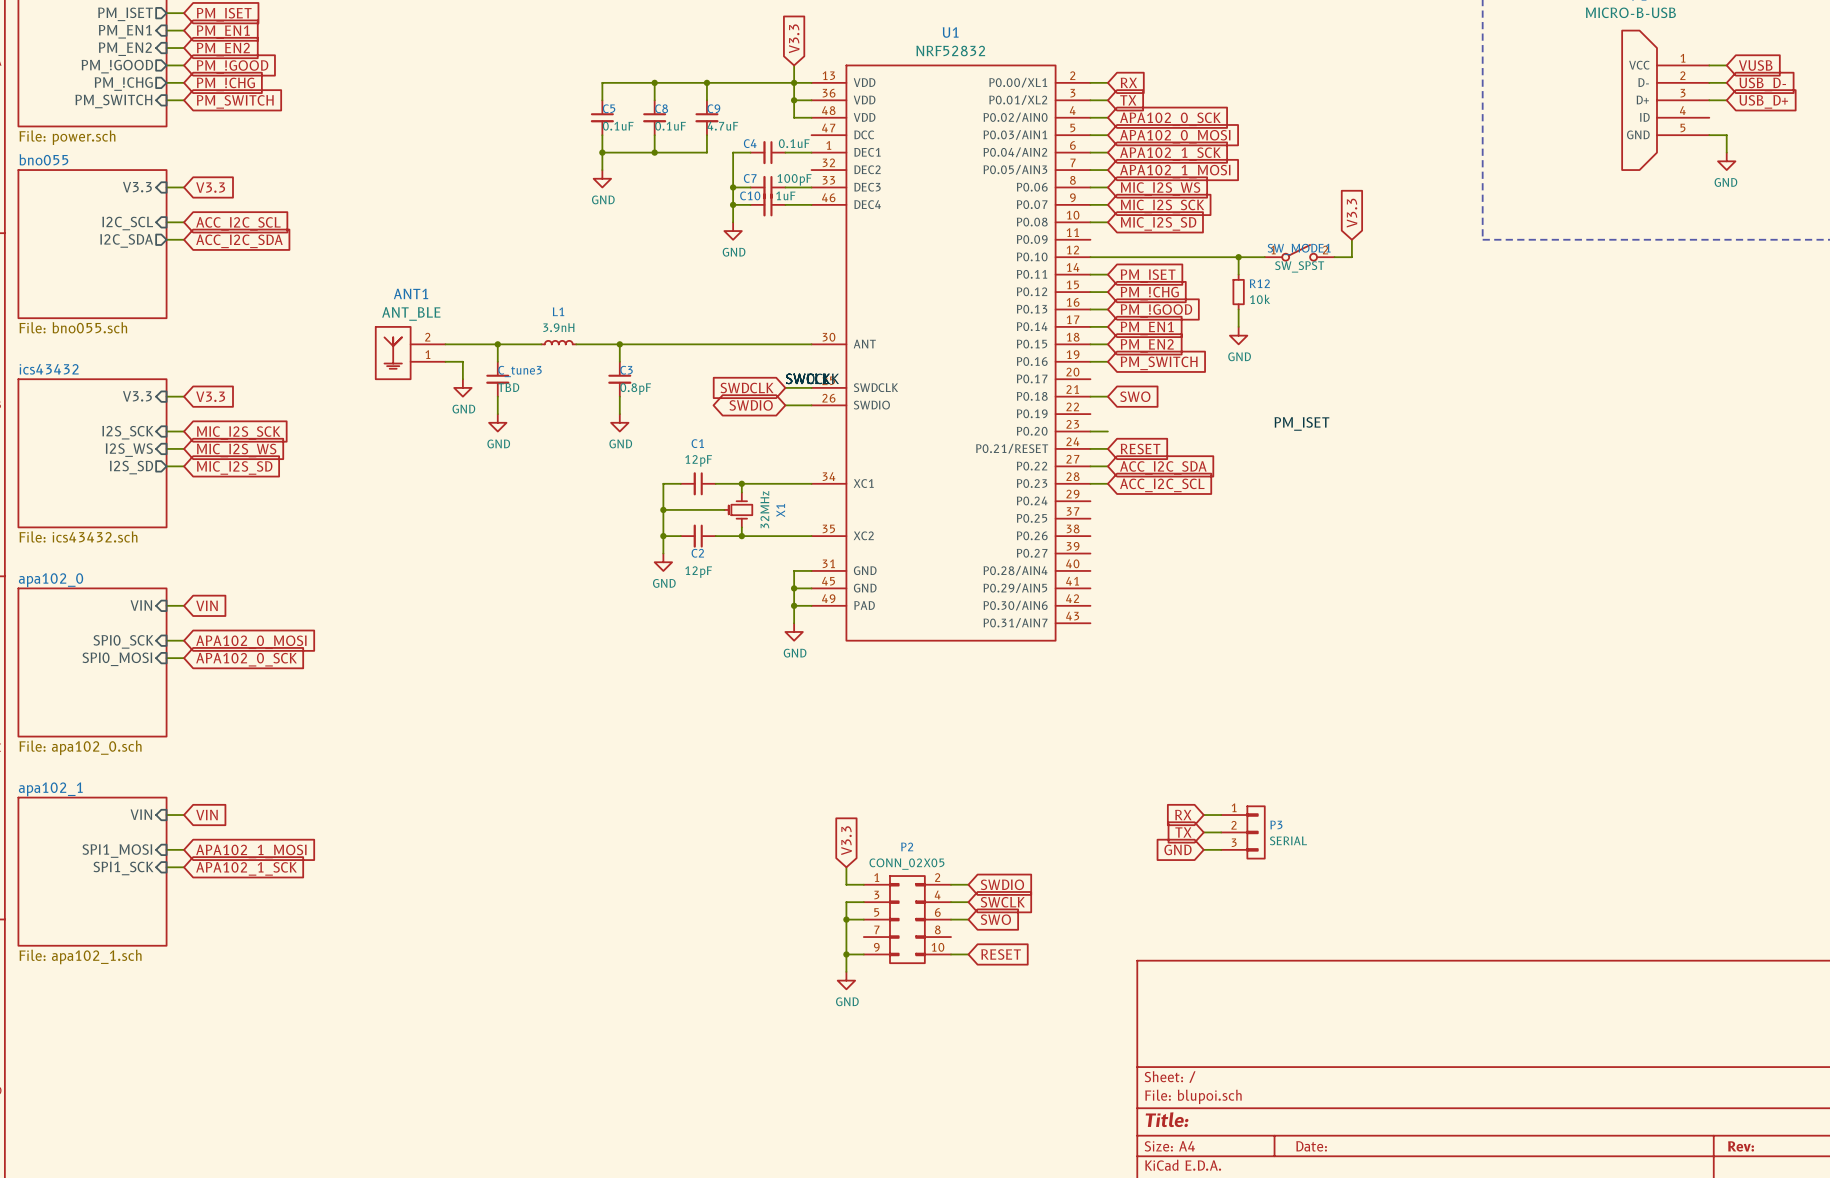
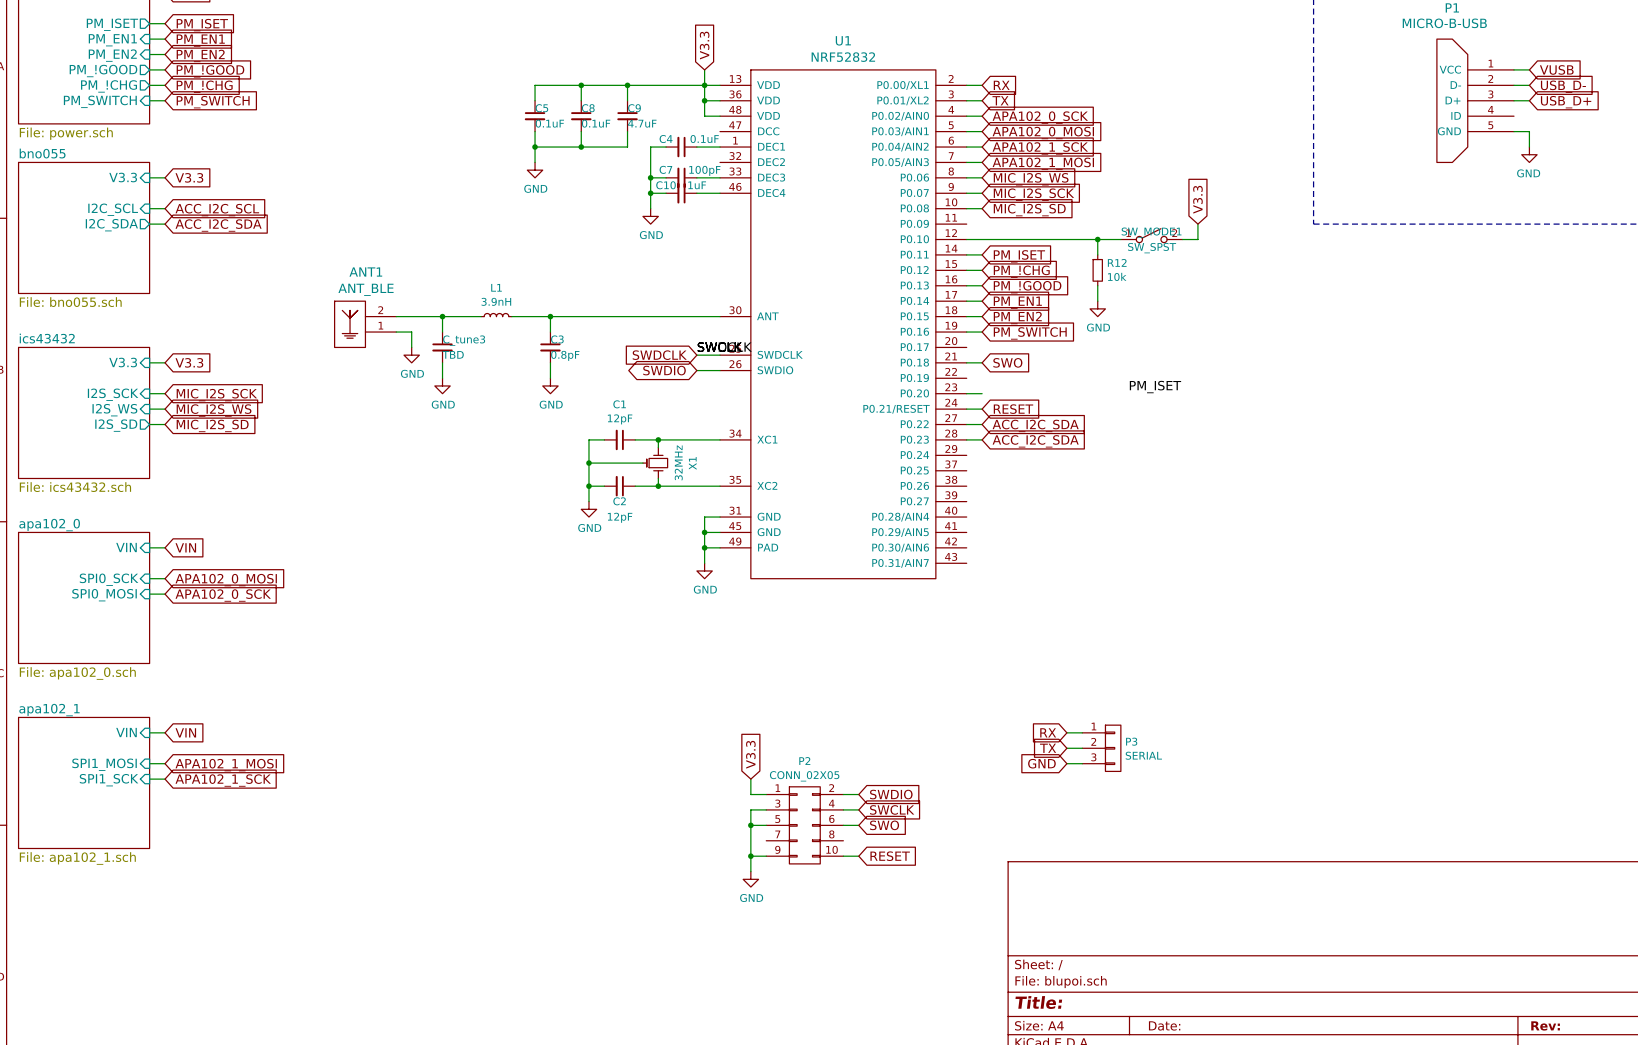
global label: ACC_I2C_SCL (1162, 485) -> ACC_I2C_SDA (1035, 441)

